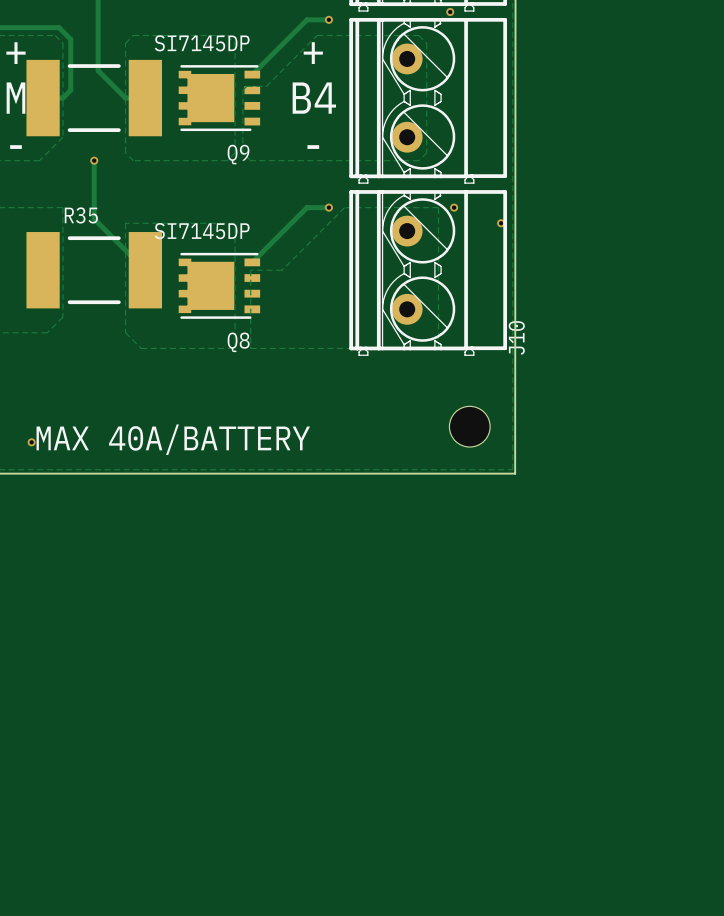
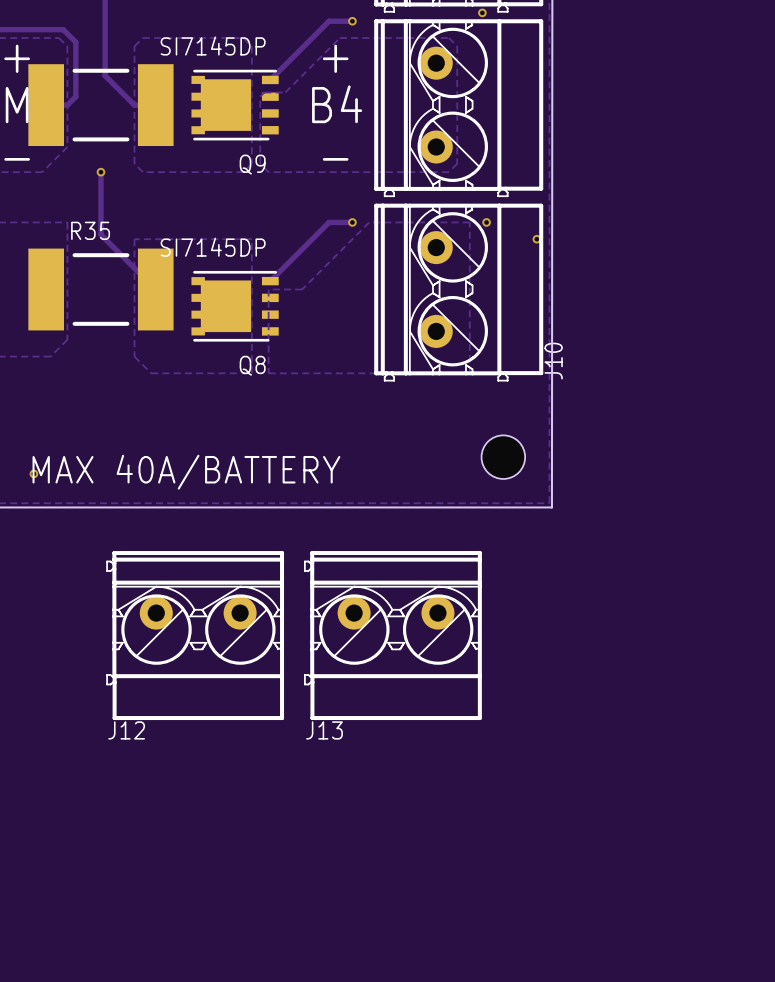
J12: none -> (195, 635)
J13: none -> (393, 635)

